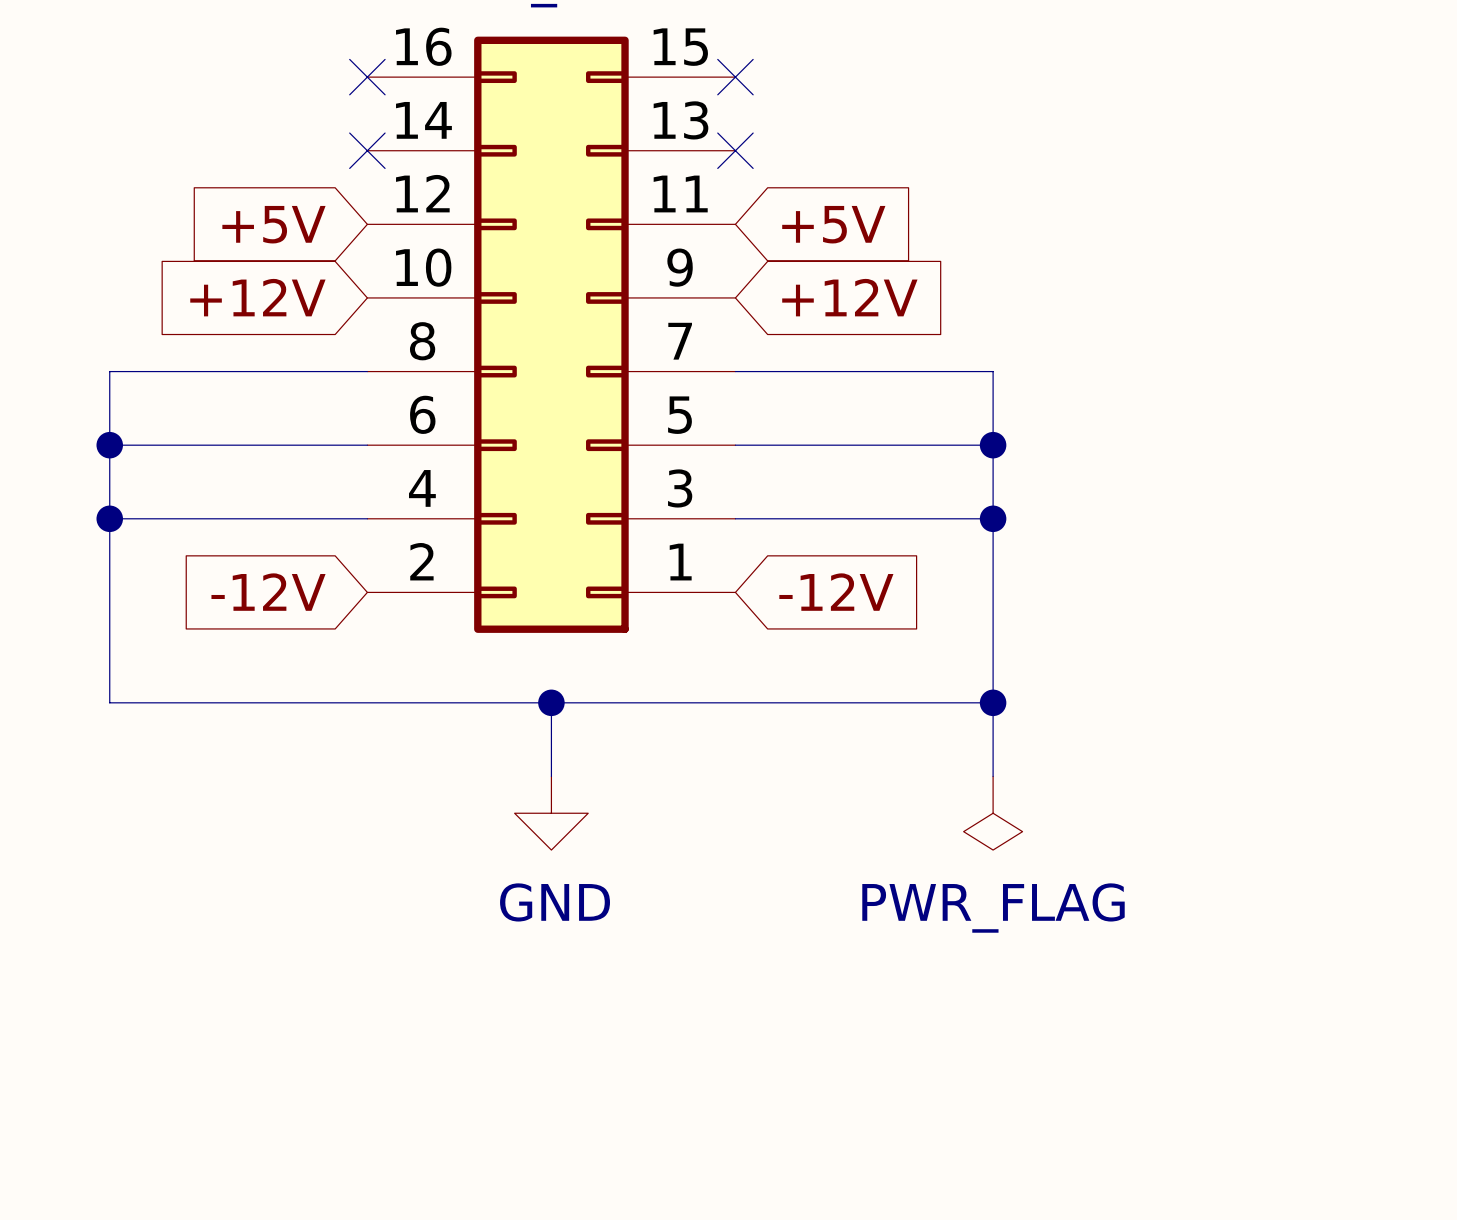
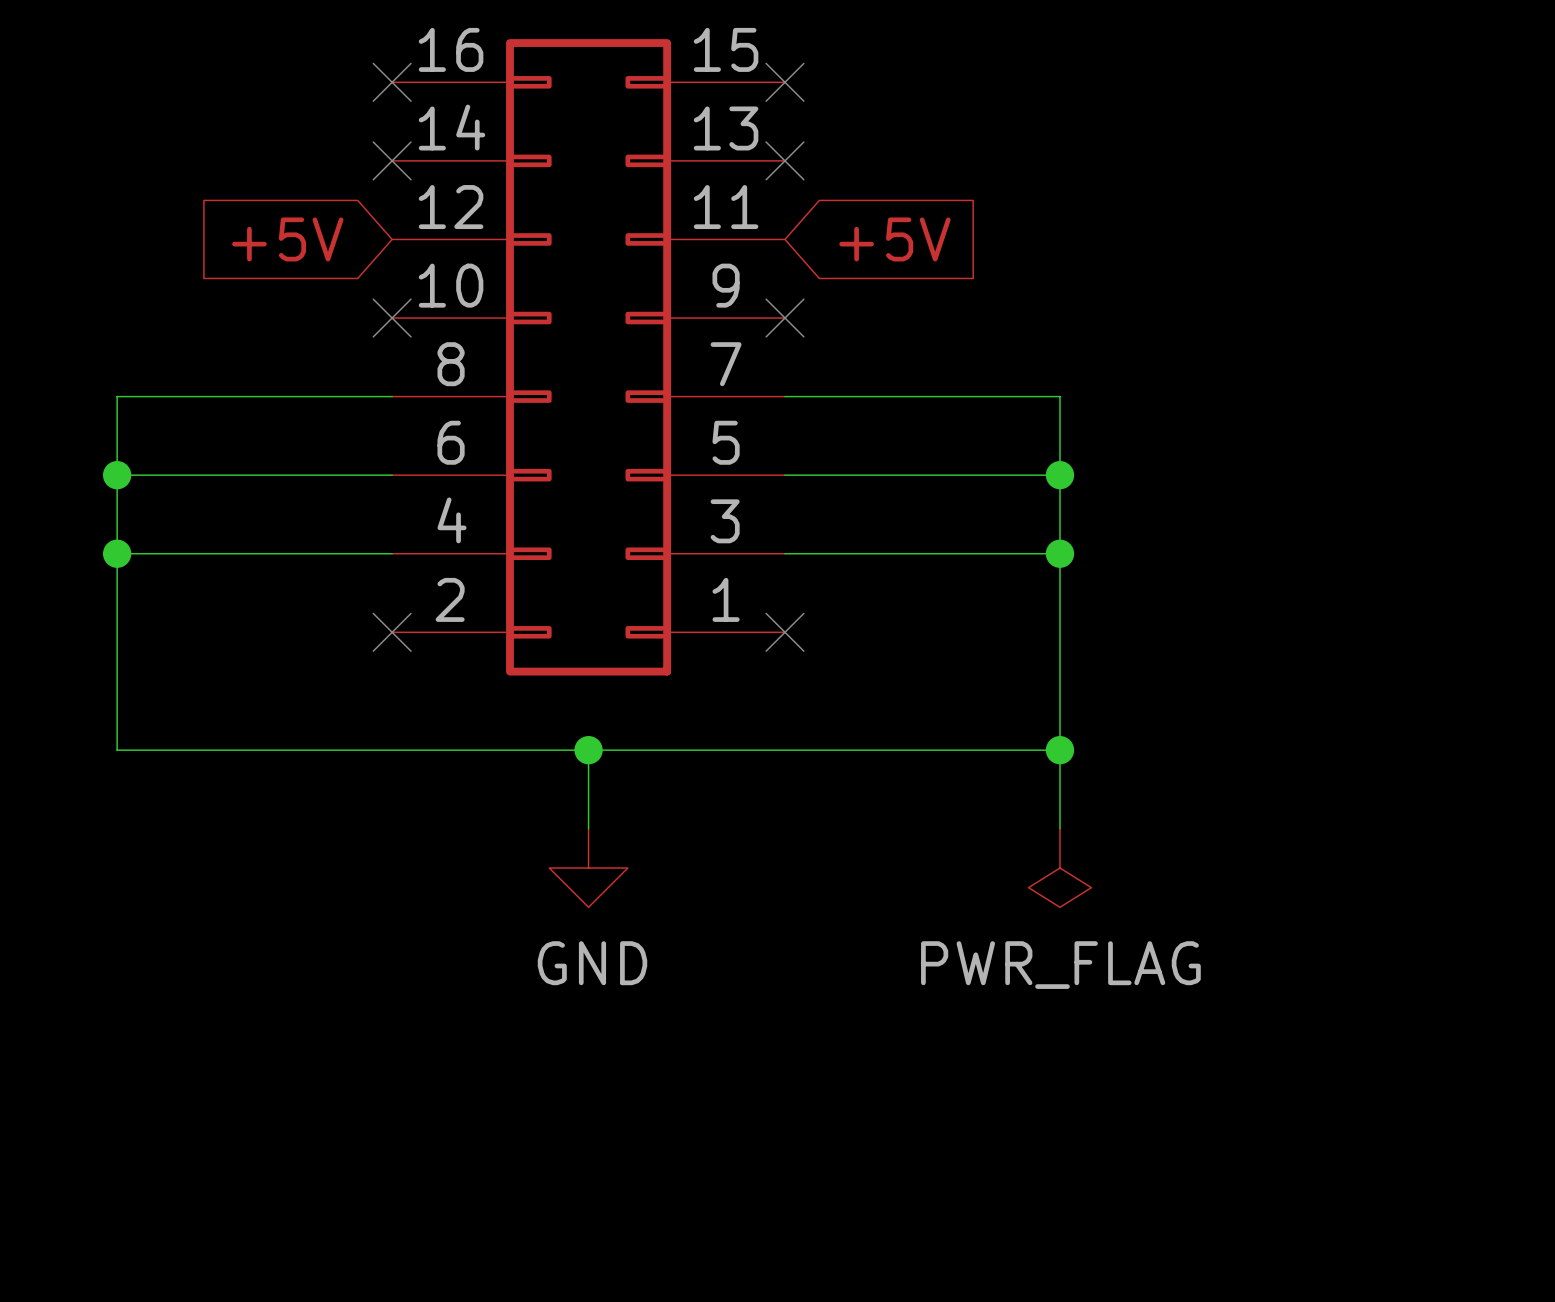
global label: +12V (257, 297) -> none
no-connect mark: none -> (392, 318)
no-connect mark: none -> (784, 318)
global label: +12V (849, 297) -> none
global label: -12V (268, 592) -> none
no-connect mark: none -> (392, 632)
no-connect mark: none -> (784, 632)
global label: -12V (836, 592) -> none

